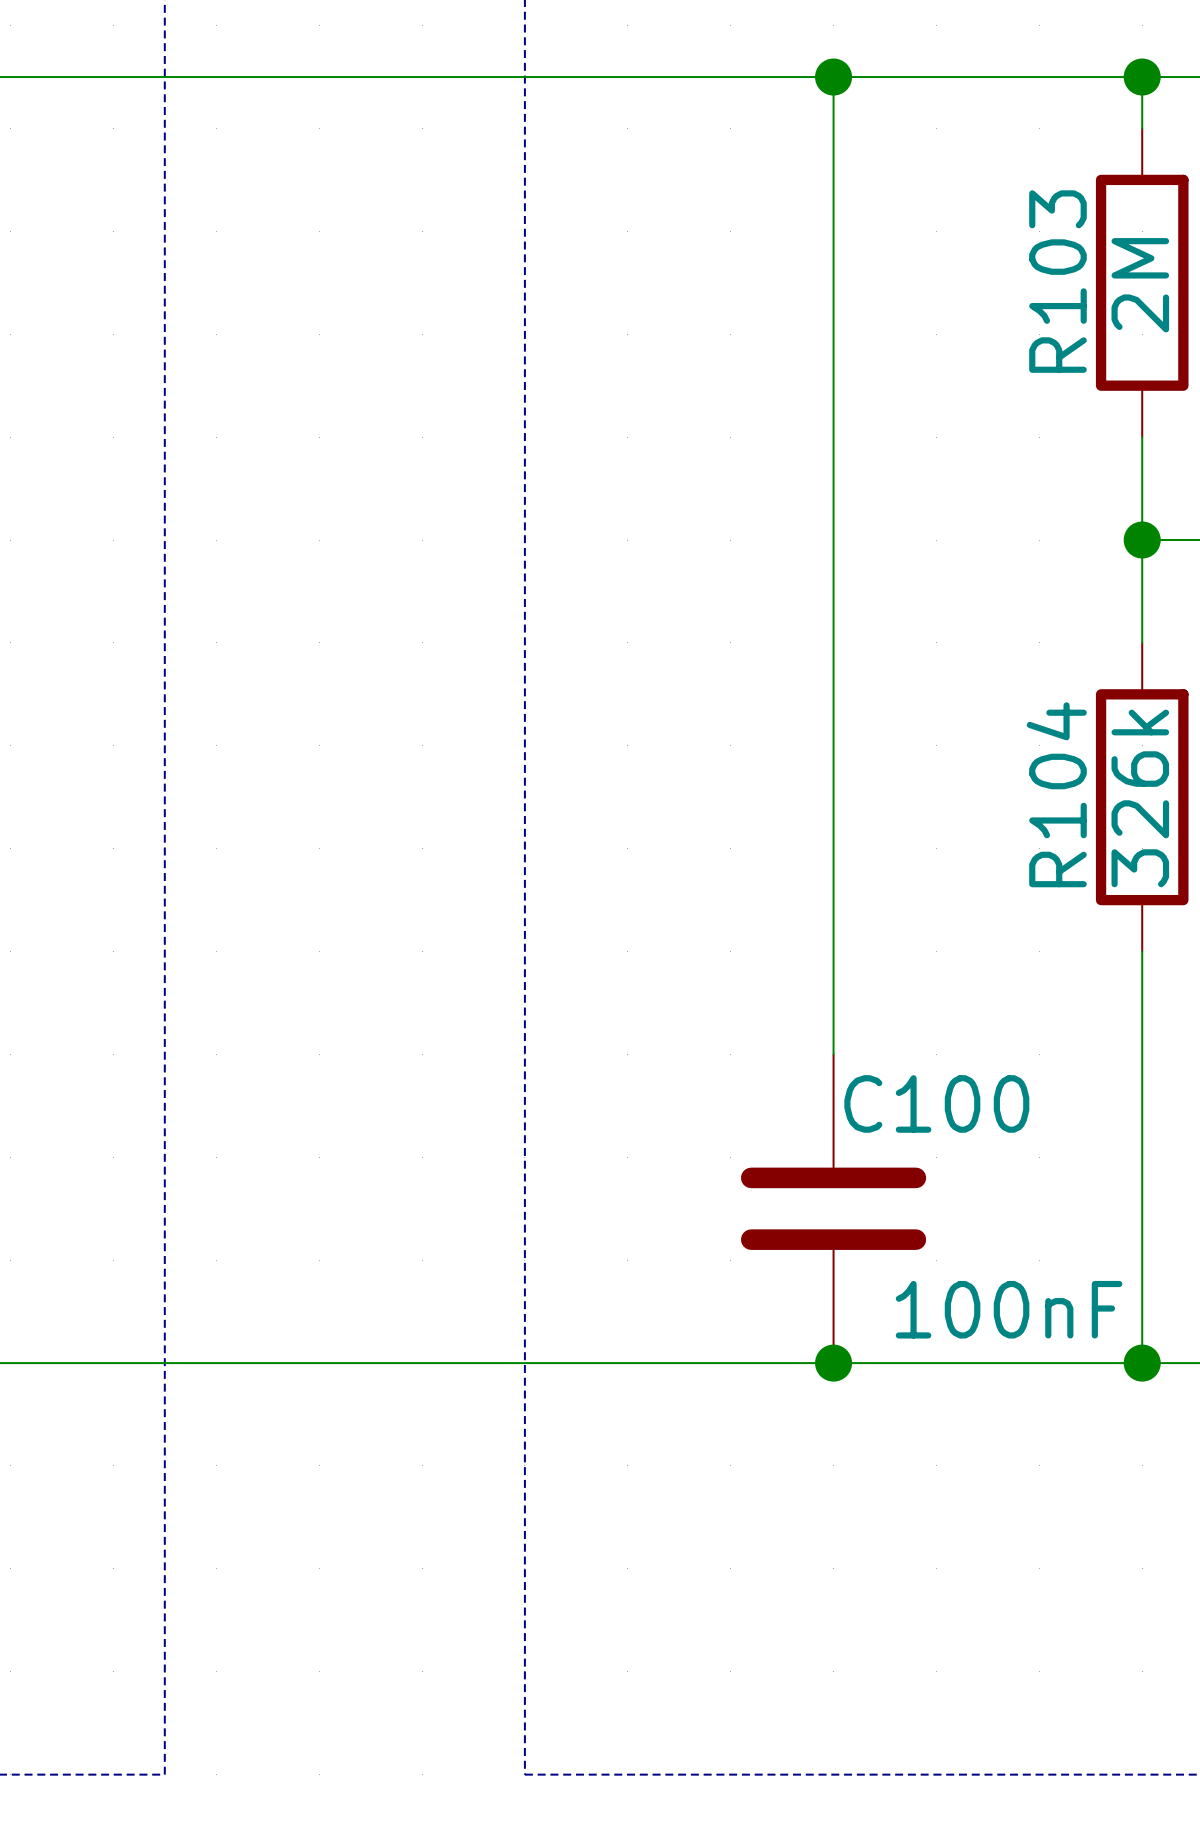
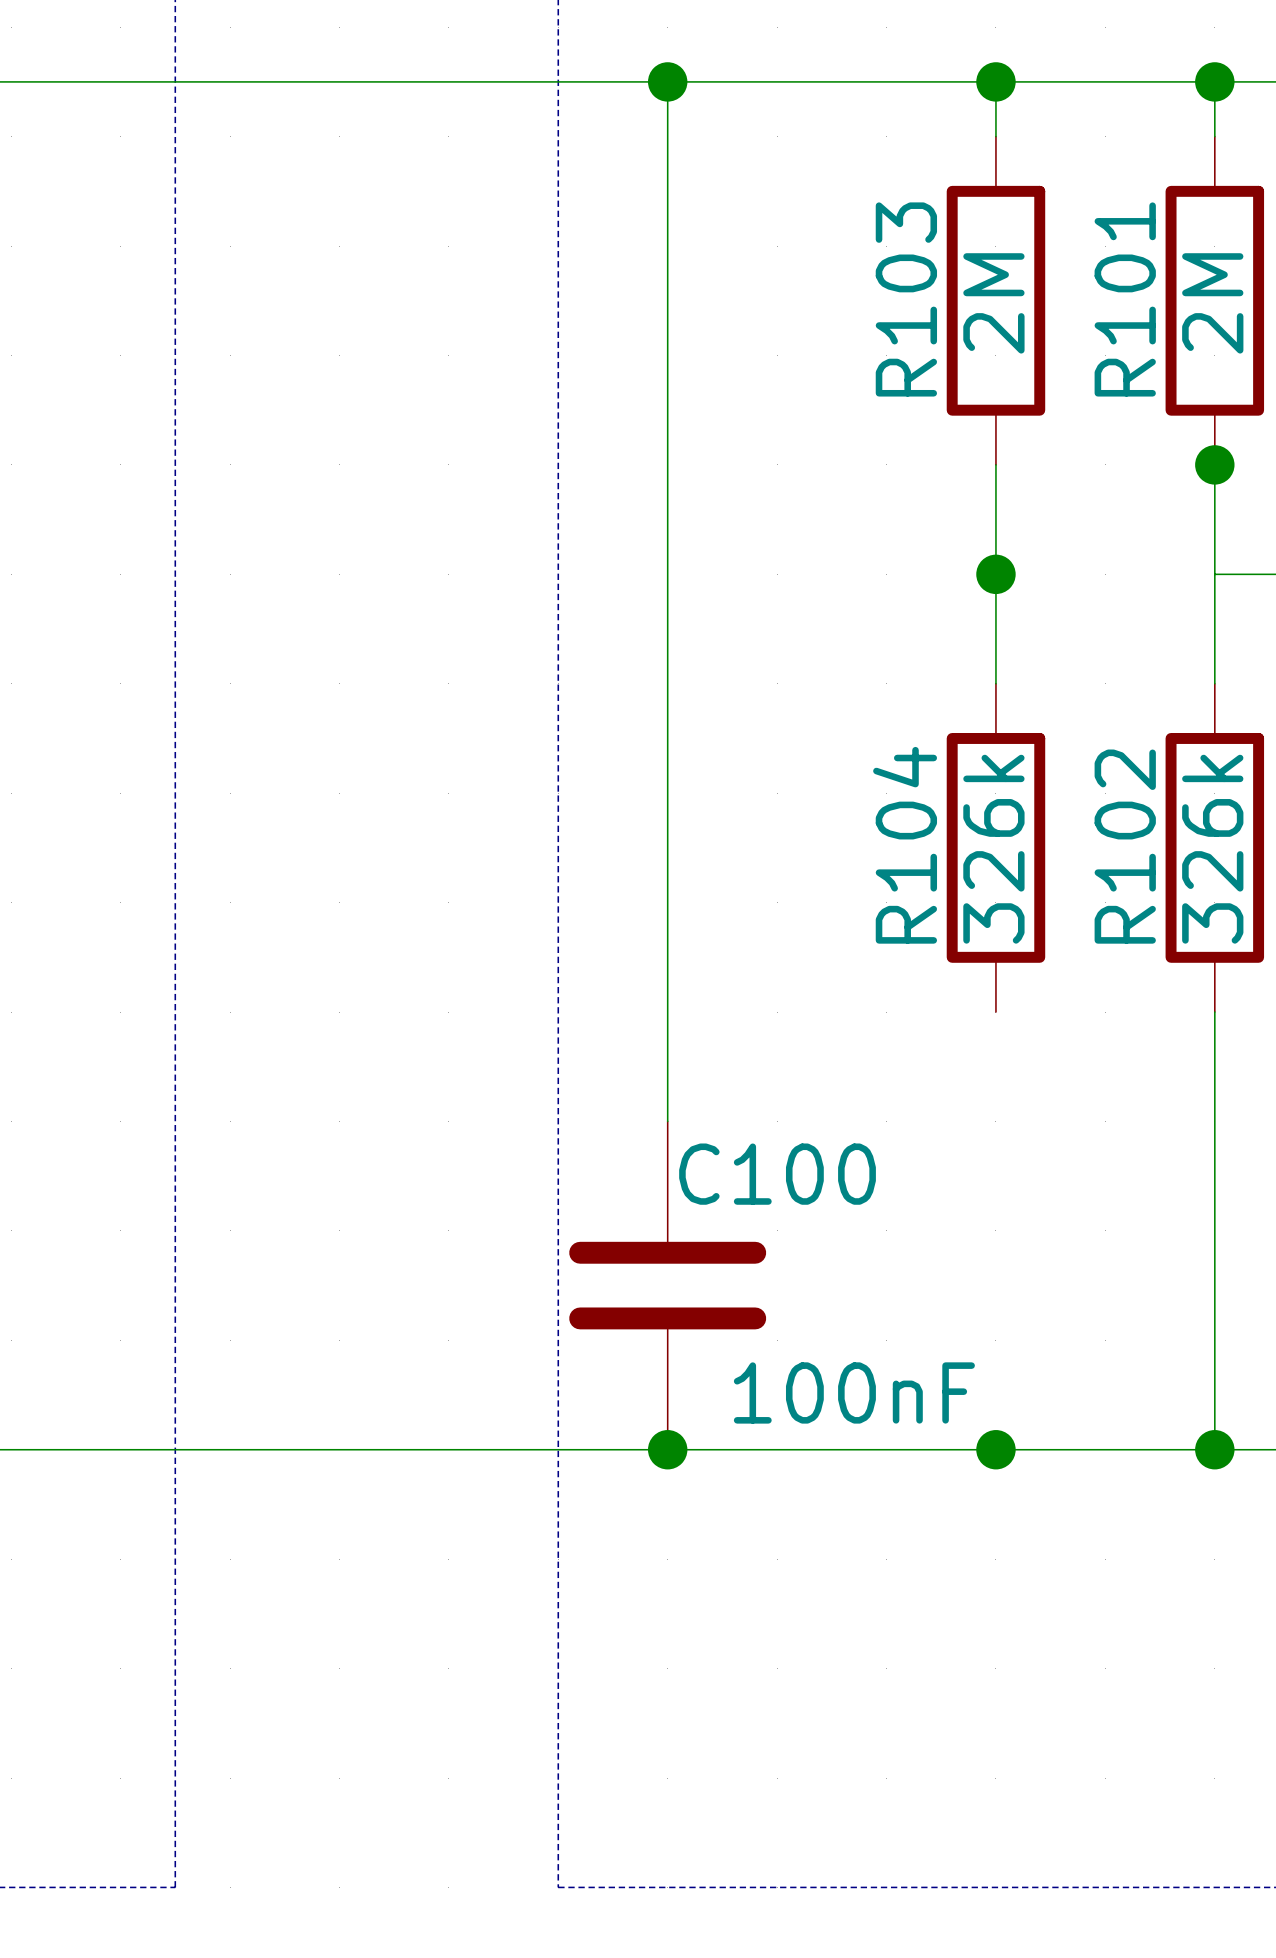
junction: none -> (667, 81)
wire: (833, 77) (833, 1054) -> (667, 81) (667, 1121)
junction: (833, 77) -> none
wire: none -> (995, 81) (995, 136)
junction: none -> (995, 81)
R103 name: R103 (1057, 281) -> R101 (1125, 299)
R103: none -> 2M (995, 300)
wire: none -> (995, 464) (995, 683)
junction: none -> (1214, 464)
junction: none -> (995, 574)
junction: (1142, 540) -> none
R104 name: R104 (1056, 794) -> R102 (1125, 846)
R104: none -> 326k (995, 847)
C100 position: (833, 1208) -> (667, 1285)
junction: none -> (667, 1449)
junction: (833, 1363) -> none
junction: none -> (995, 1449)

